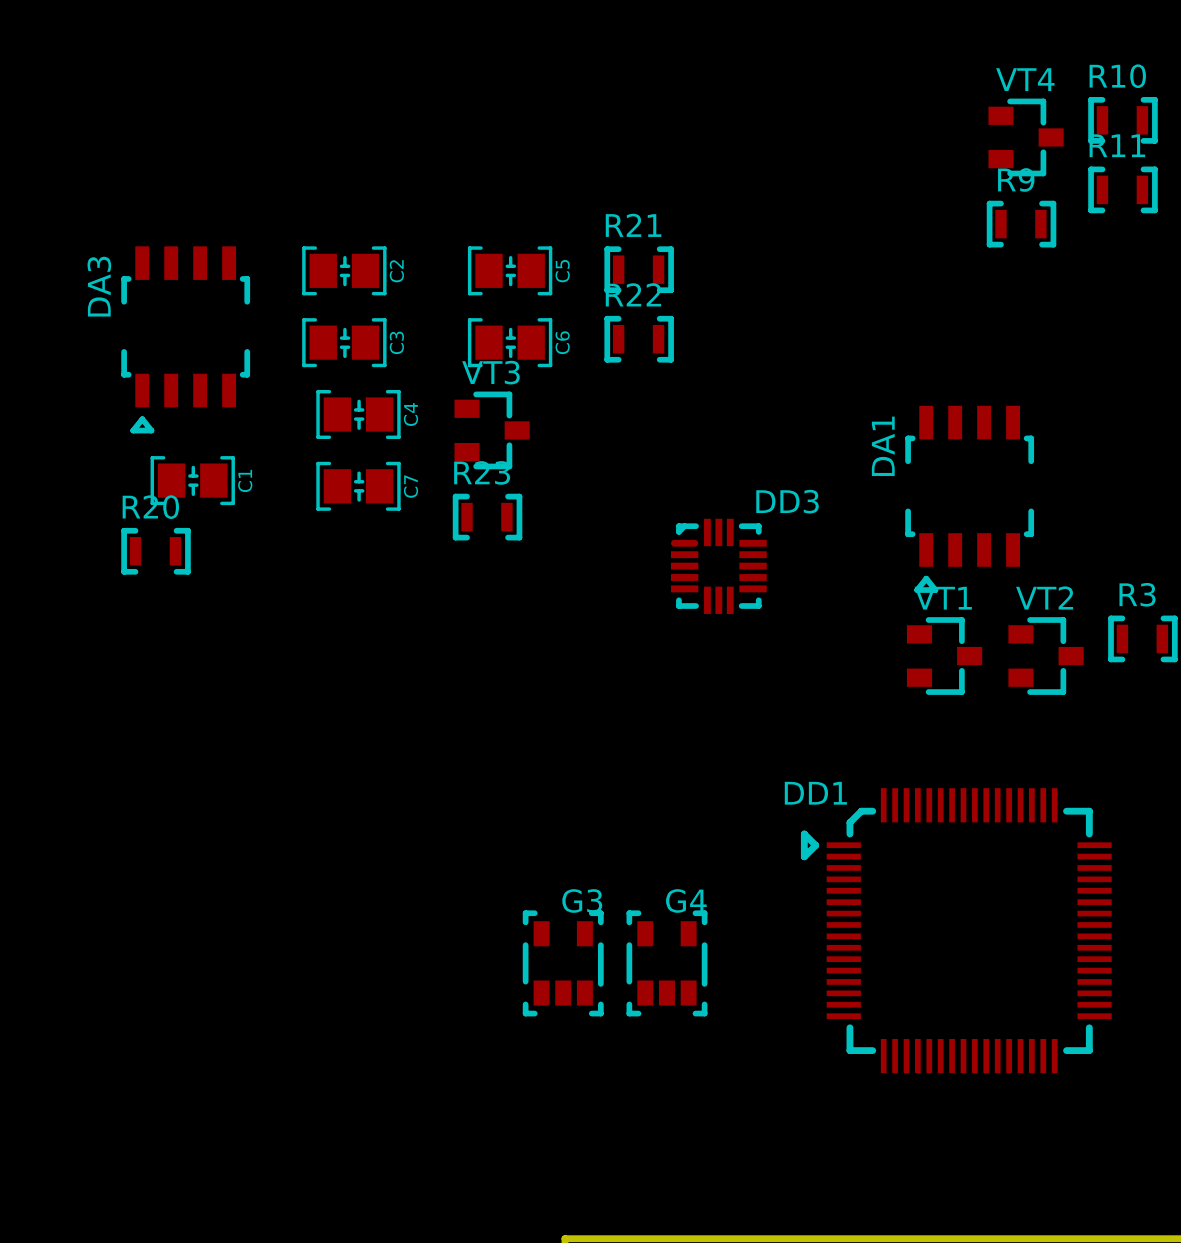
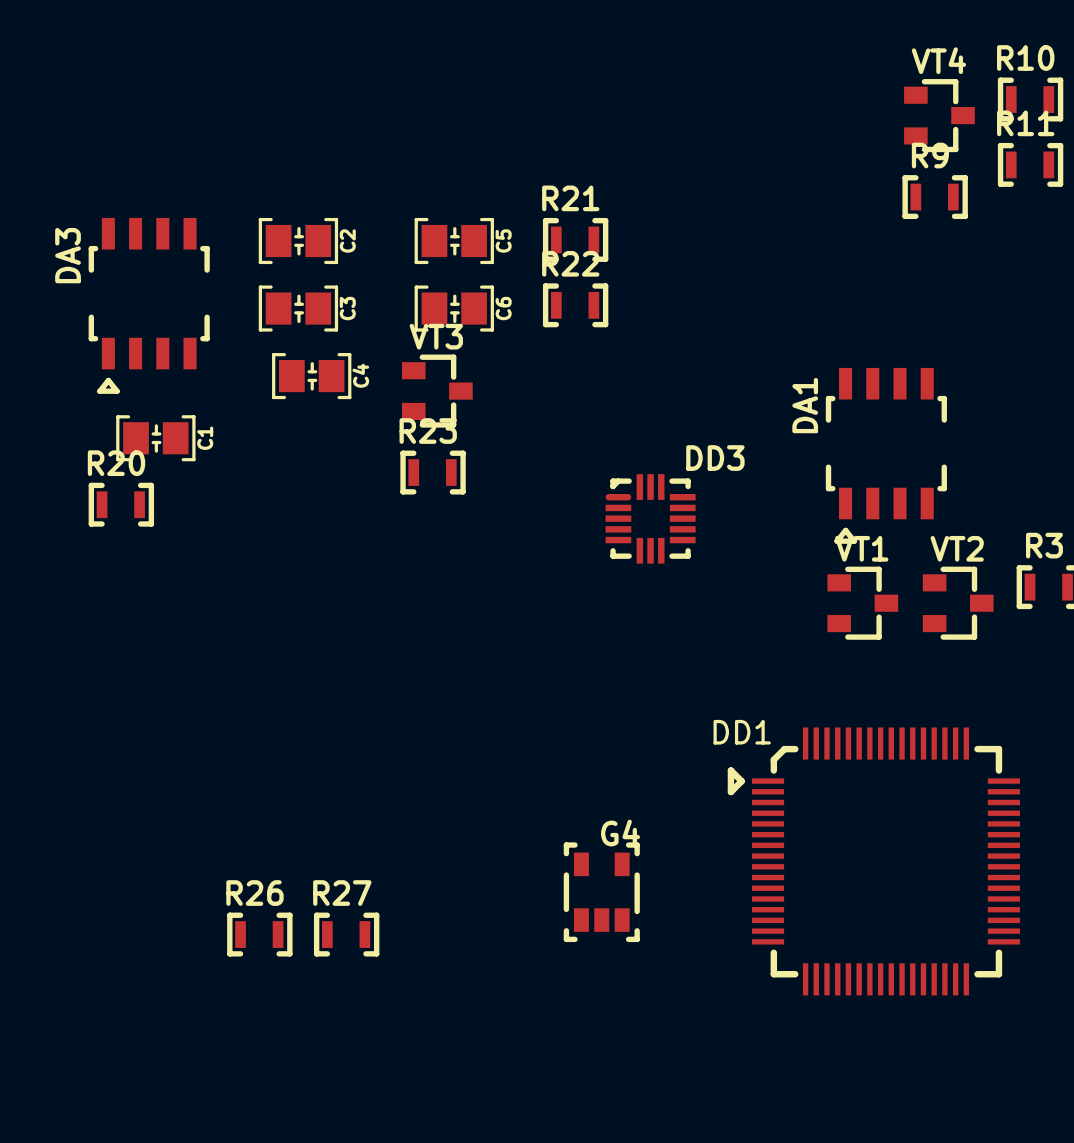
C7: (358, 486) -> none
G3: (563, 963) -> none
R26: none -> (259, 934)
R27: none -> (346, 934)

